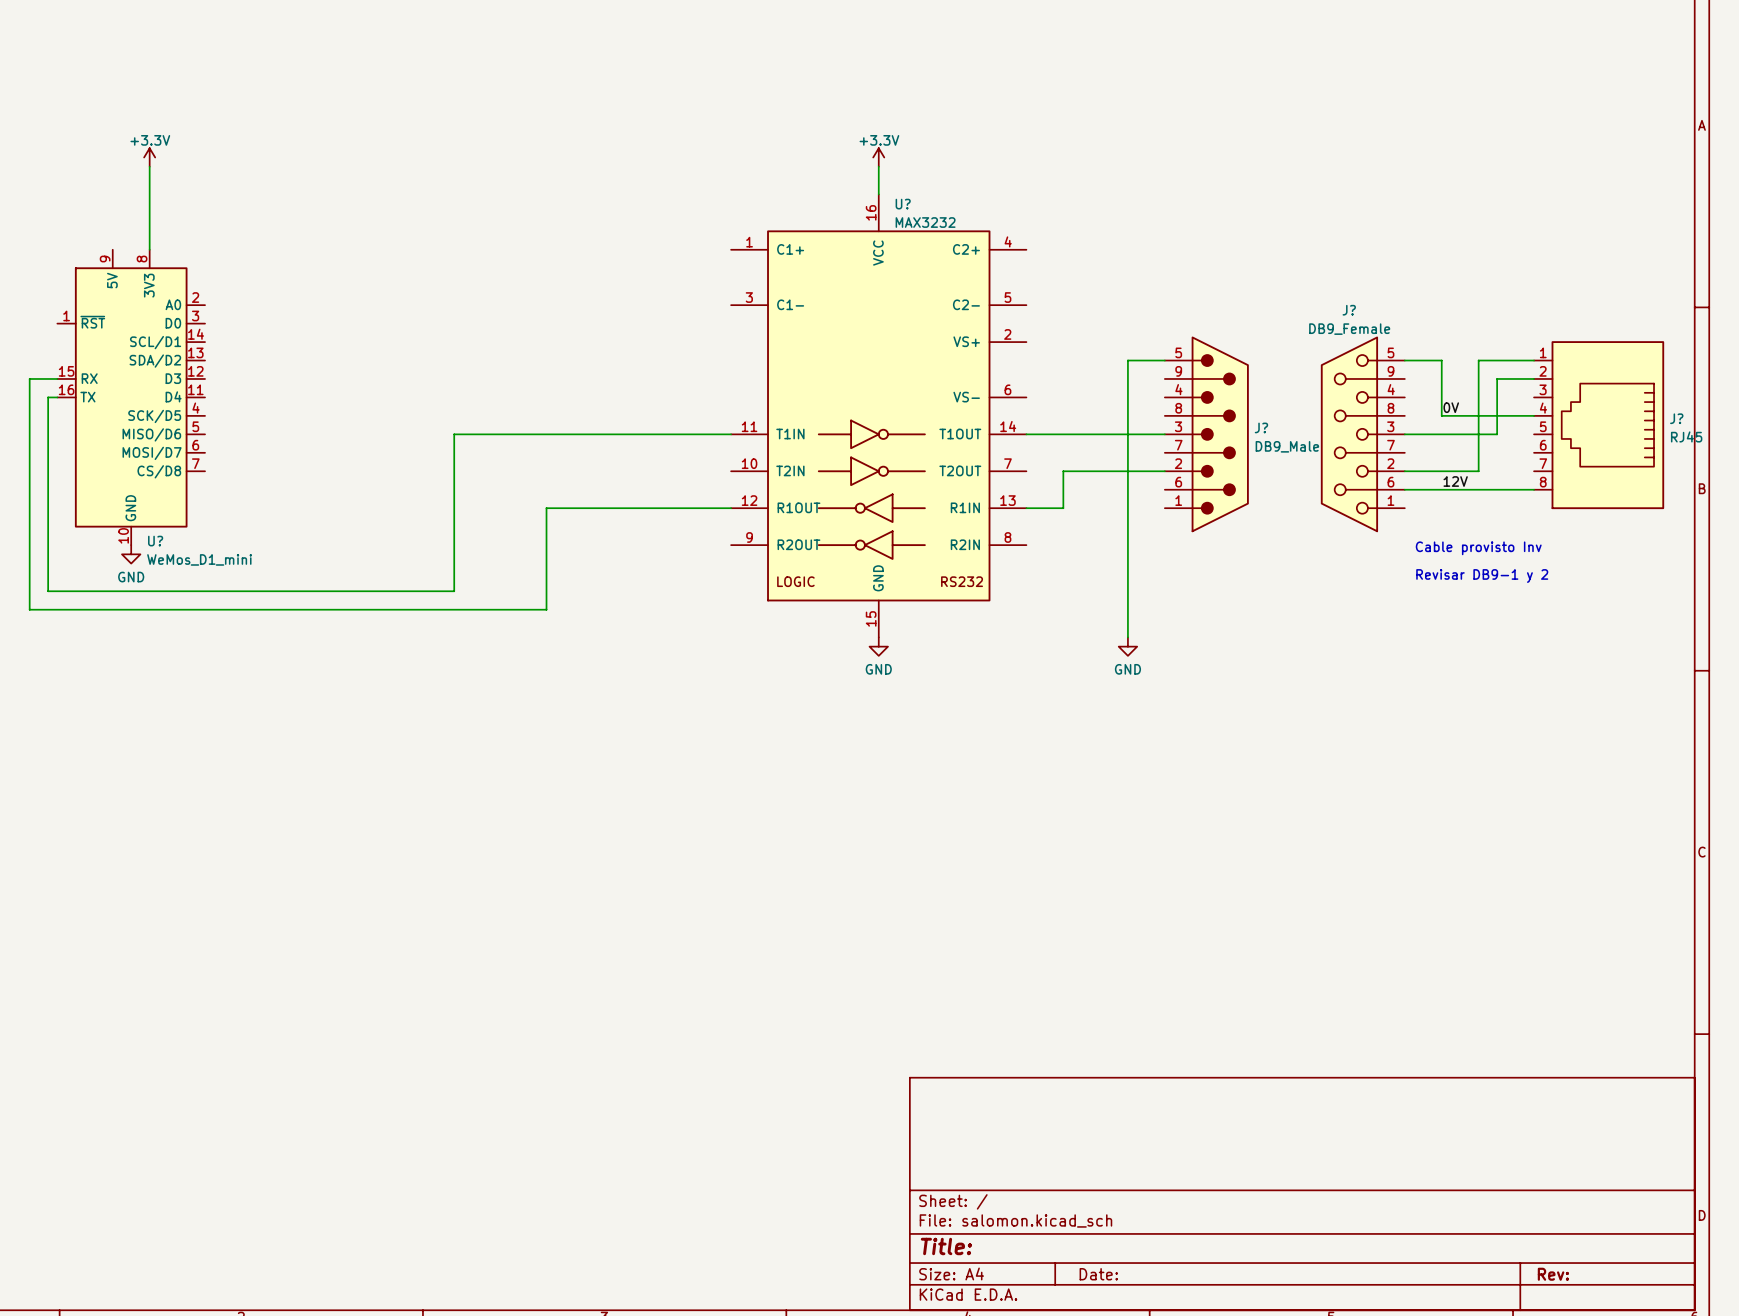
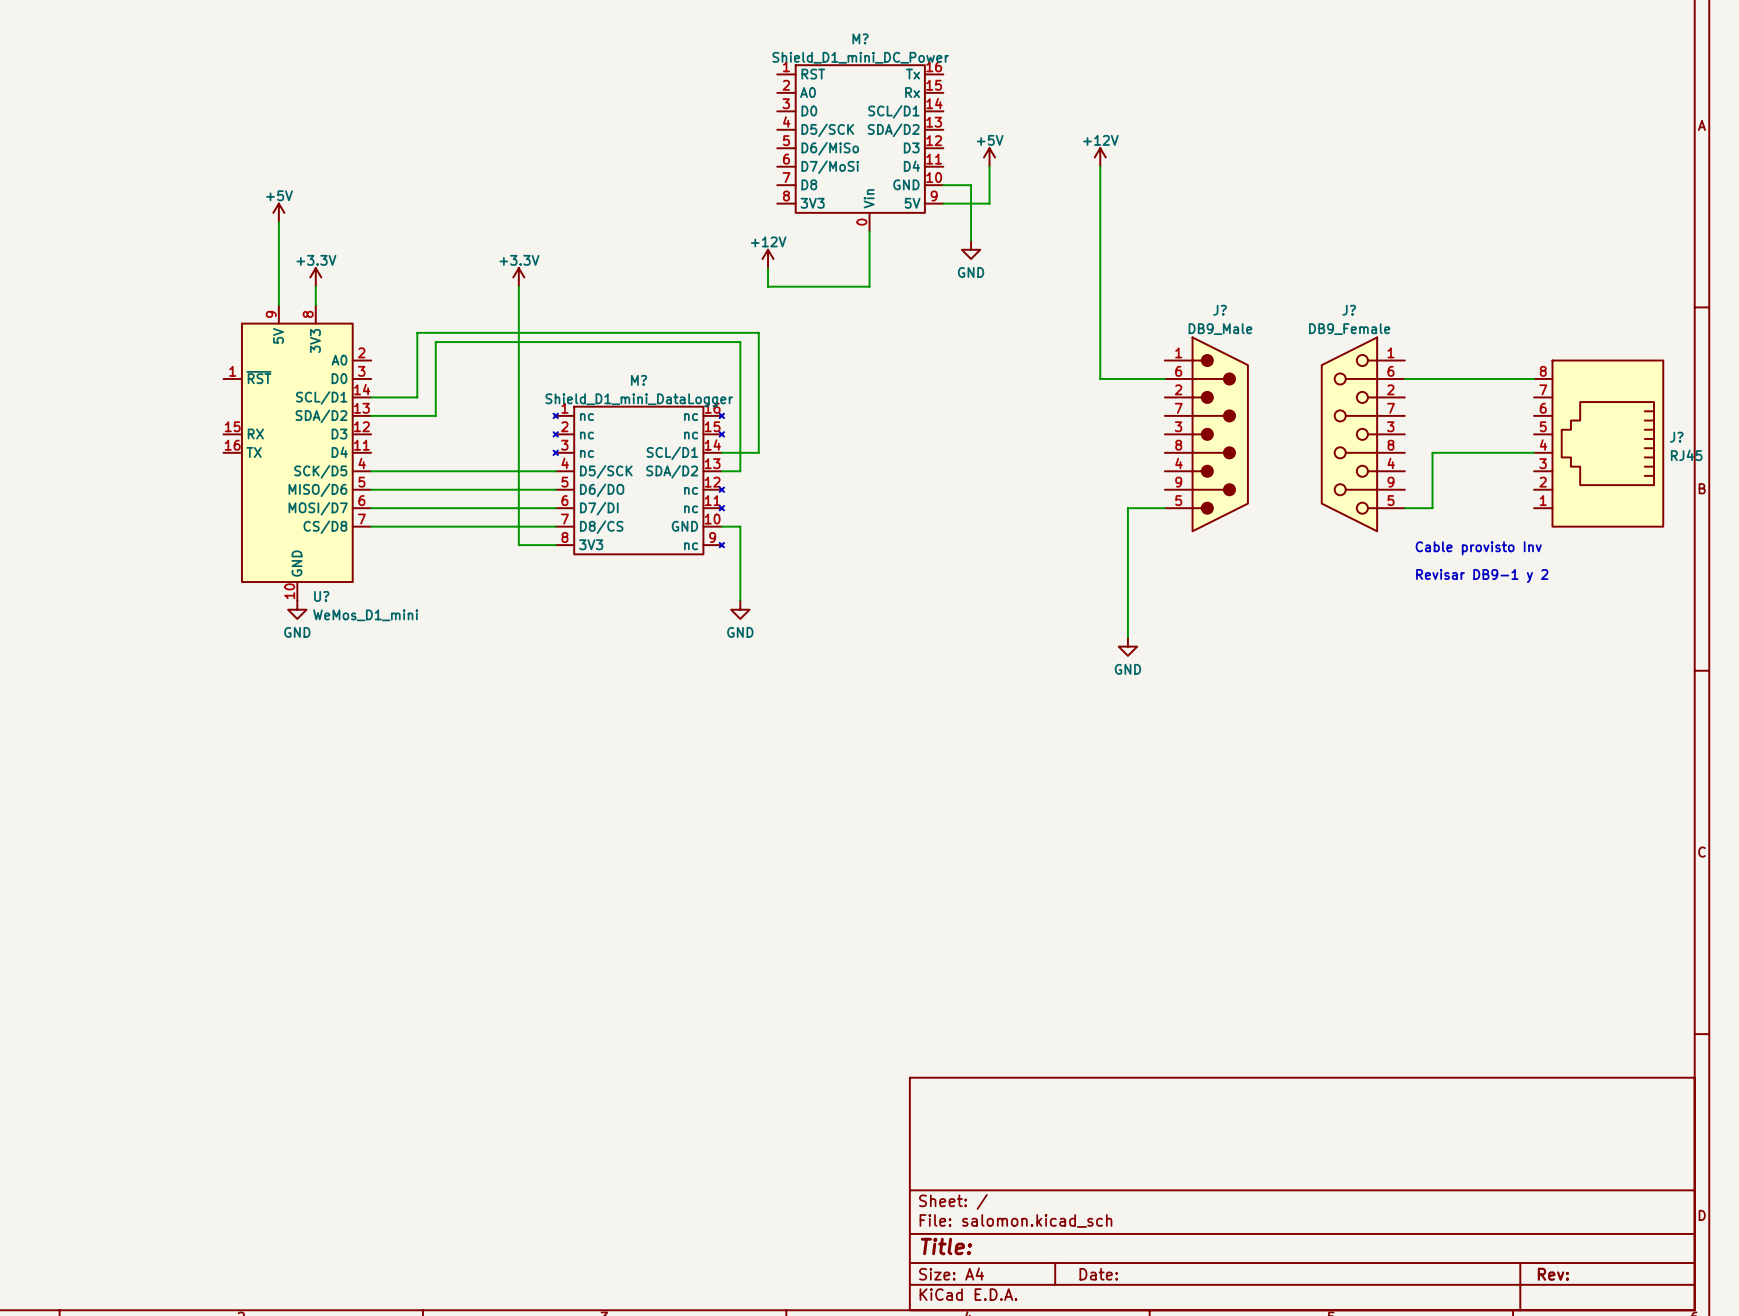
M?: none -> Shield_D1_mini_DC_Power (860, 148)
power symbol: +3.3V (149, 157) -> none
power symbol: +3.3V (878, 157) -> none
power symbol: none -> +5V (989, 157)
power symbol: none -> +12V (1100, 157)
wire: (149, 166) (149, 249) -> (278, 222) (278, 305)
wire: (878, 166) (878, 194) -> none
wire: none -> (989, 166) (989, 203) (943, 203)
wire: none -> (1100, 166) (1100, 378) (1164, 378)
wire: none -> (943, 185) (971, 185) (971, 240)
power symbol: none -> +5V (278, 212)
power symbol: none -> GND (971, 249)
power symbol: none -> +12V (768, 259)
power symbol: none -> +3.3V (315, 277)
power symbol: none -> +3.3V (518, 277)
wire: none -> (315, 286) (315, 305)
wire: none -> (518, 286) (518, 545) (555, 545)
wire: (1164, 360) (1127, 360) (1127, 508) -> (1164, 508) (1127, 508)
wire: (1404, 360) (1441, 360) (1441, 415) (1534, 415) -> none
wire: (1534, 360) (1478, 360) (1478, 471) (1404, 471) -> none
wire: (57, 378) (29, 378) (29, 609) (546, 609) (546, 508) -> (371, 508) (546, 508)
wire: (1497, 378) (1497, 434) (1404, 434) -> (1497, 378) (1404, 378)
wire: (57, 397) (48, 397) (48, 591) (454, 591) (454, 434) (731, 434) -> none
U? position: (131, 397) -> (297, 452)
wire: none -> (371, 397) (417, 397) (417, 332) (758, 332) (758, 452) (721, 452)
label: 0V (1451, 407) -> none
wire: none -> (371, 415) (435, 415) (435, 342) (740, 342) (740, 471) (721, 471)
U?: MAX3232 (878, 415) -> none
J?: RJ45 (1599, 425) -> none
J? name position: J? (1261, 427) -> J? (1220, 310)
wire: (1026, 434) (1164, 434) -> none
J? flip: as is (1220, 434) -> up-down (1220, 434)
J? flip: as is (1349, 434) -> up-down (1349, 434)
J?: none -> RJ45 (1599, 443)
J? value position: DB9_Male (1287, 446) -> DB9_Male (1220, 329)
wire: none -> (1534, 452) (1432, 452) (1432, 508) (1404, 508)
wire: none -> (371, 471) (555, 471)
wire: (1164, 471) (1063, 471) (1063, 508) (1026, 508) -> none
M?: none -> Shield_D1_mini_DataLogger (638, 480)
label: 12V (1455, 481) -> none
wire: none -> (371, 489) (555, 489)
wire: (1404, 489) (1534, 489) -> none
wire: (555, 508) (731, 508) -> none
wire: none -> (371, 526) (555, 526)
wire: none -> (721, 526) (740, 526) (740, 600)
power symbol position: GND (131, 554) -> GND (297, 609)
power symbol position: GND (878, 646) -> GND (740, 609)

